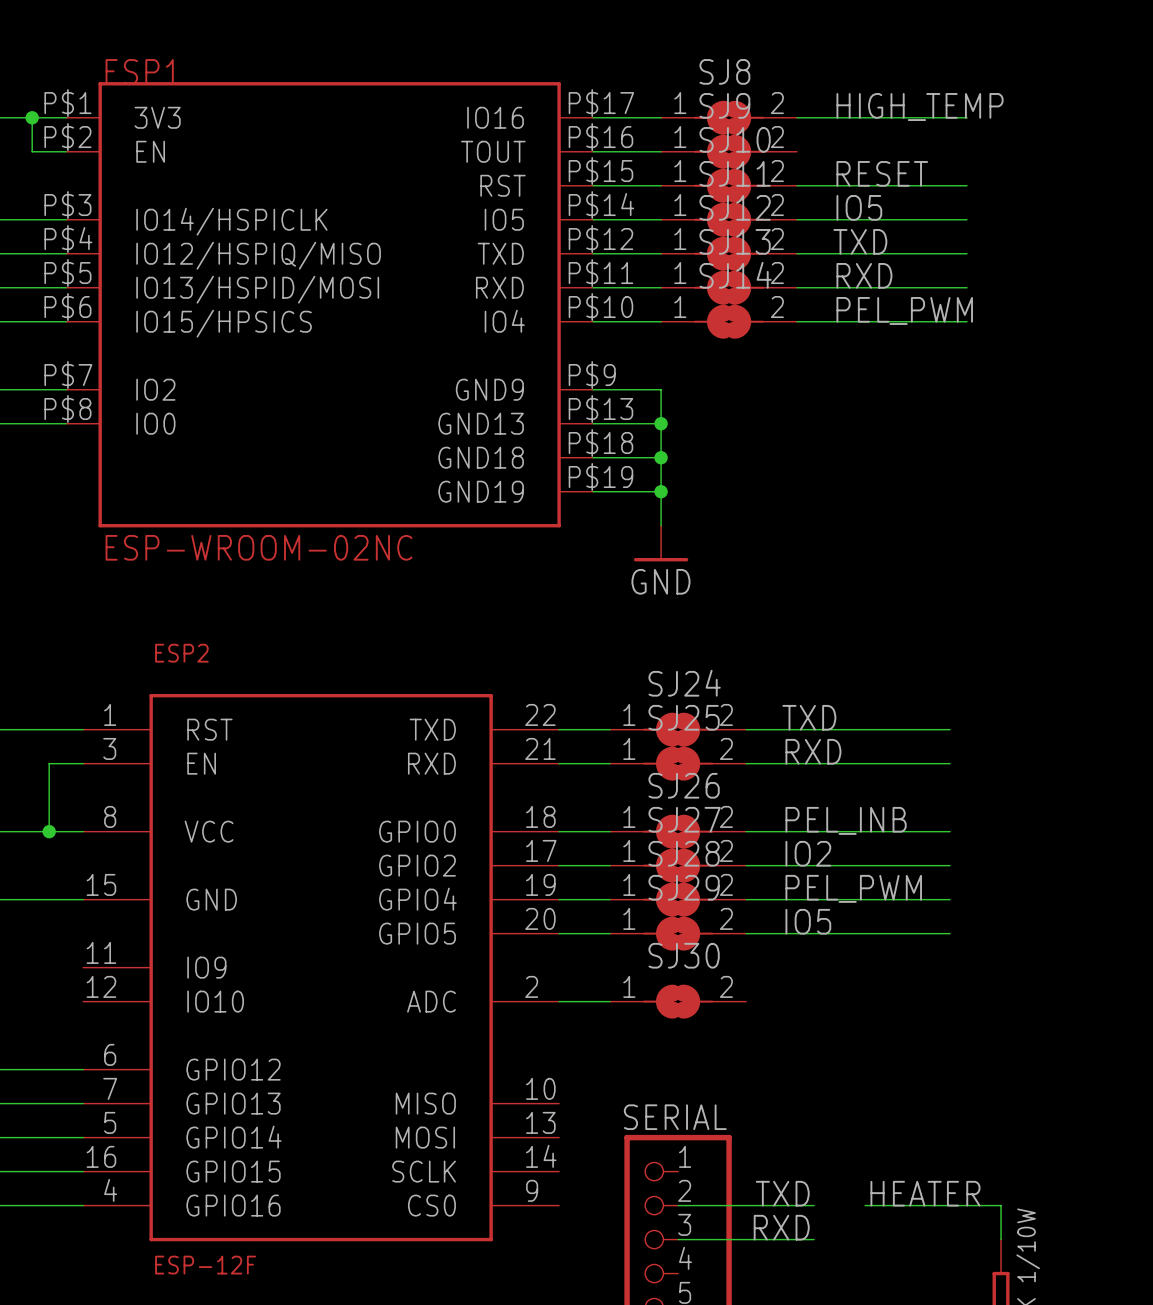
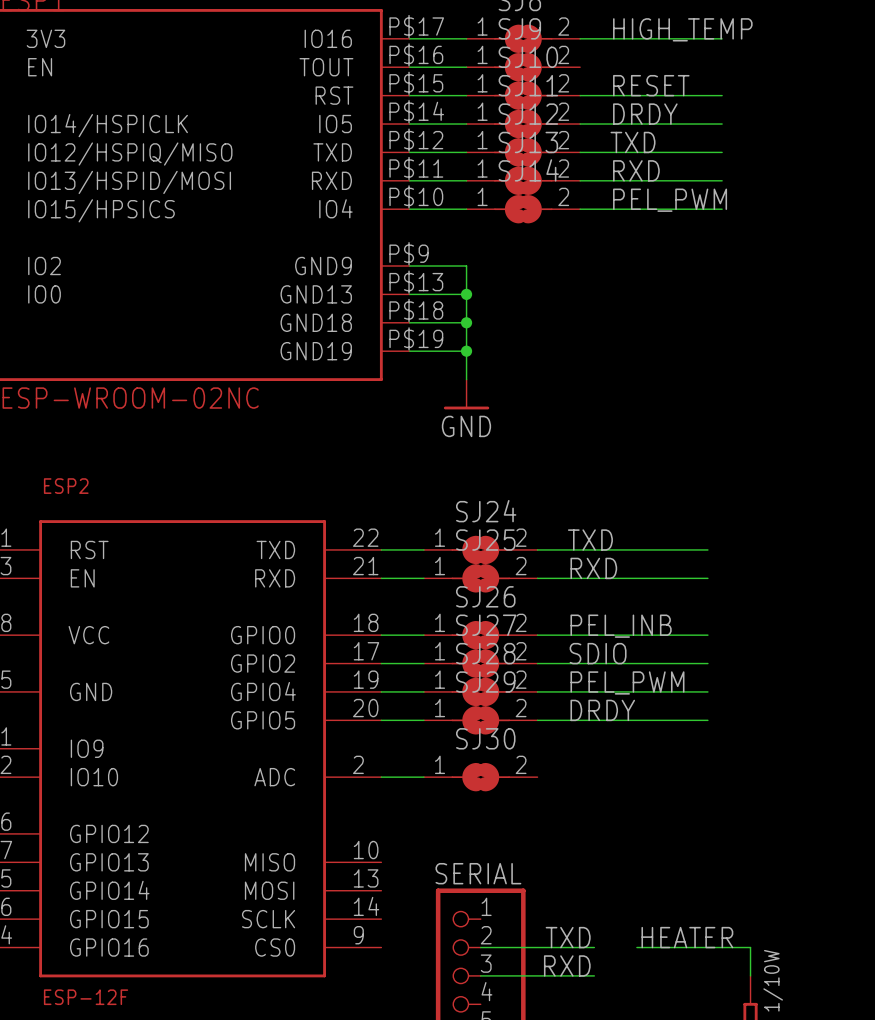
label: IO5 (859, 207) -> DRDY (645, 114)
label: IO2 (808, 853) -> SDIO (598, 653)
label: IO5 (808, 921) -> DRDY (602, 710)

